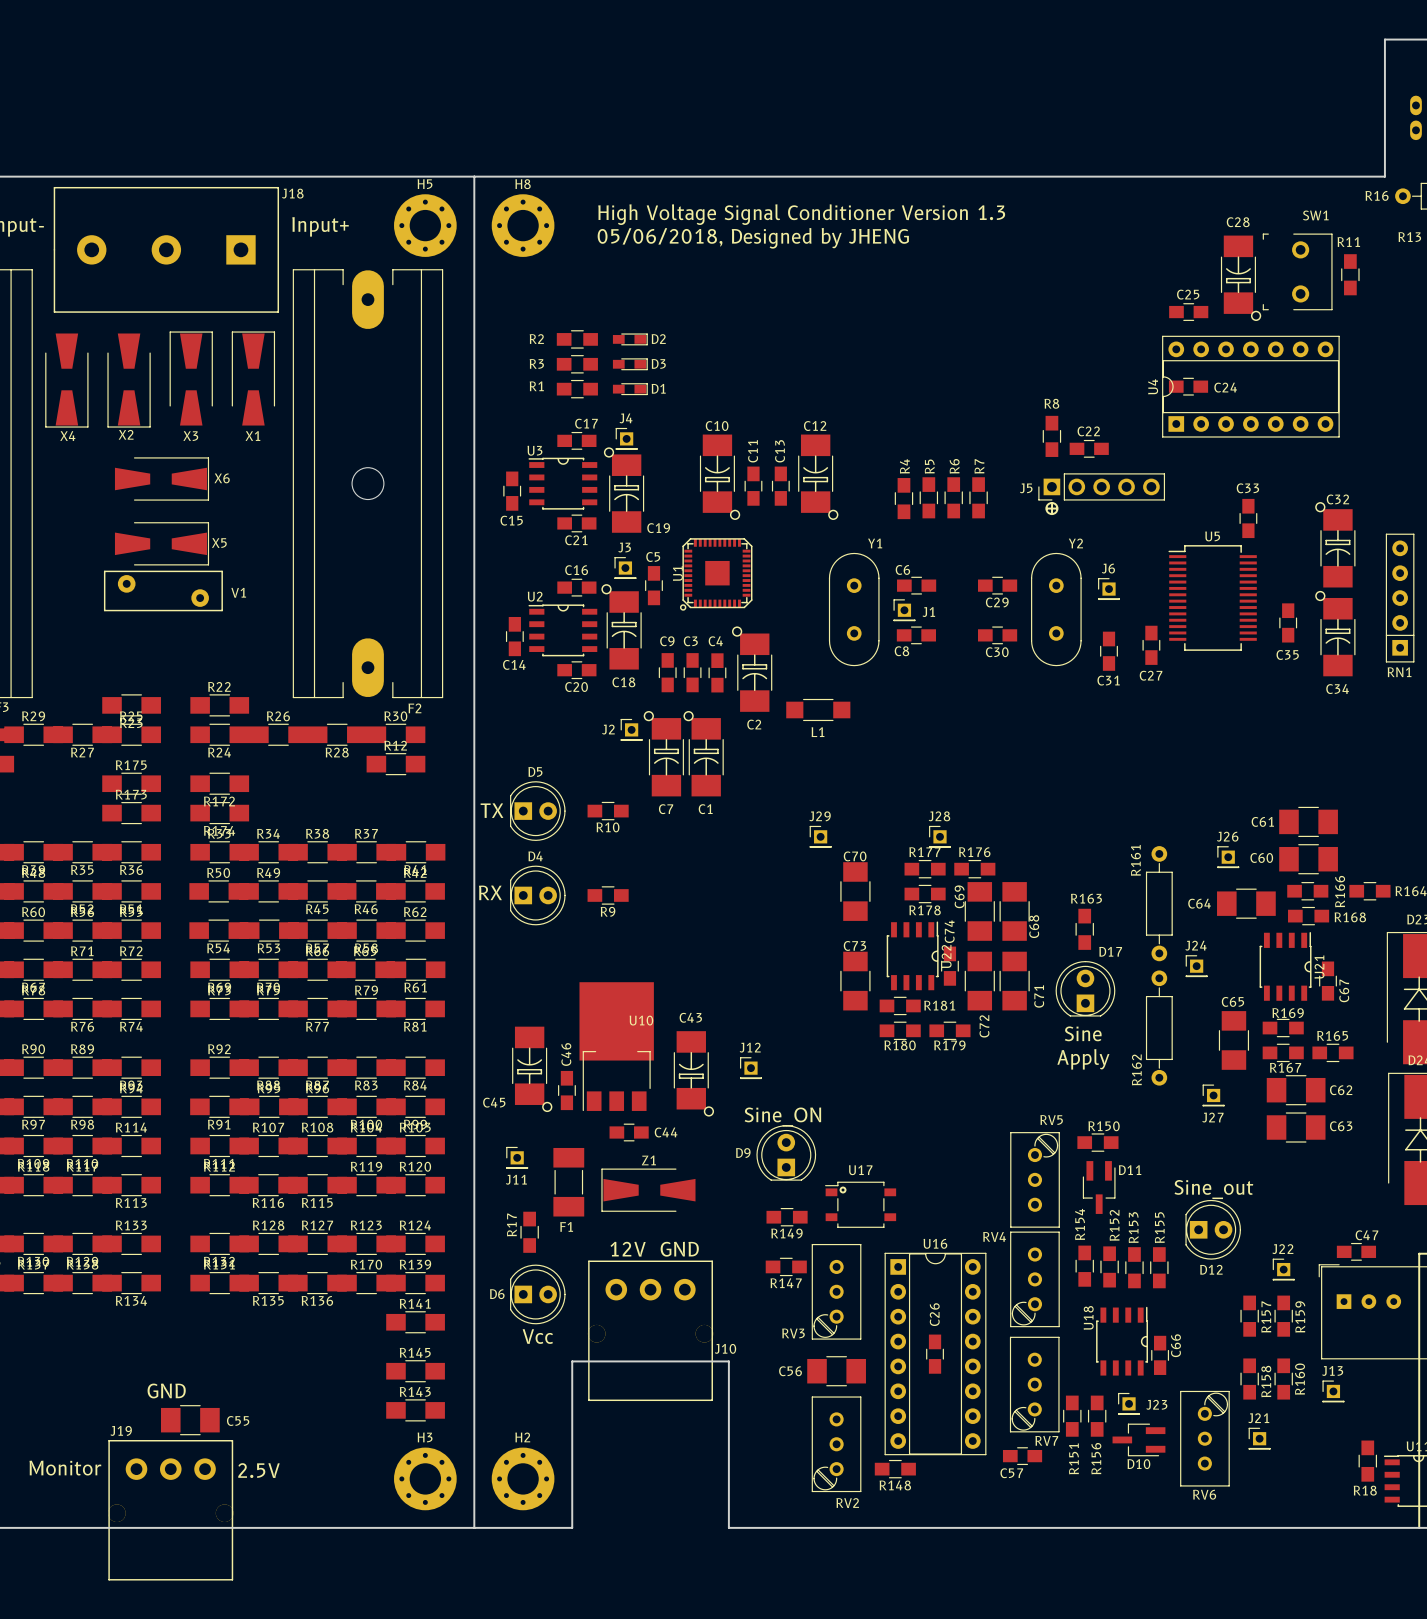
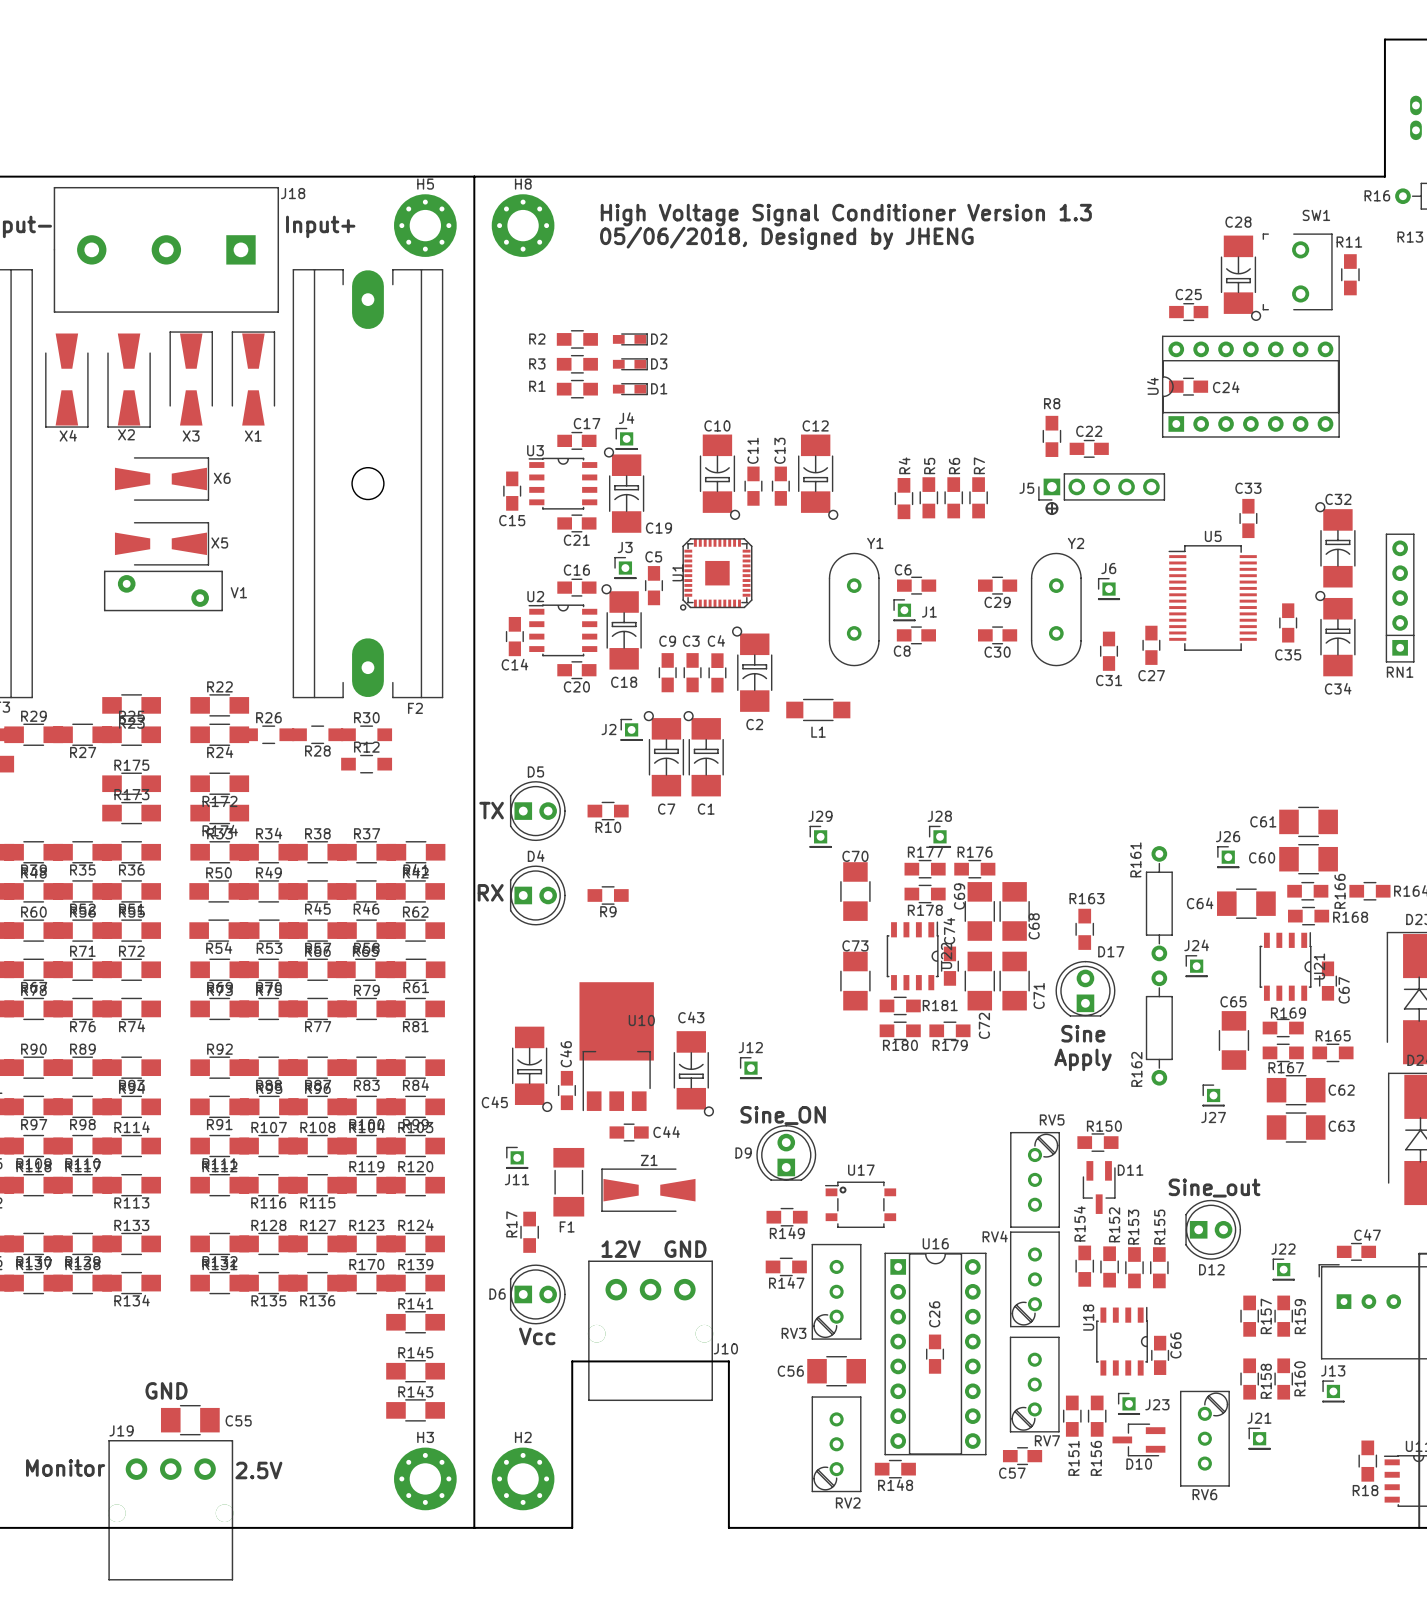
R26 footprint: [249, 723, 308, 746] -> [243, 725, 295, 744]
R28 footprint: [307, 723, 367, 746] -> [292, 725, 344, 744]
R30 footprint: [366, 723, 426, 746] -> [341, 725, 393, 744]
R12 footprint: [366, 753, 426, 776] -> [341, 754, 393, 774]

